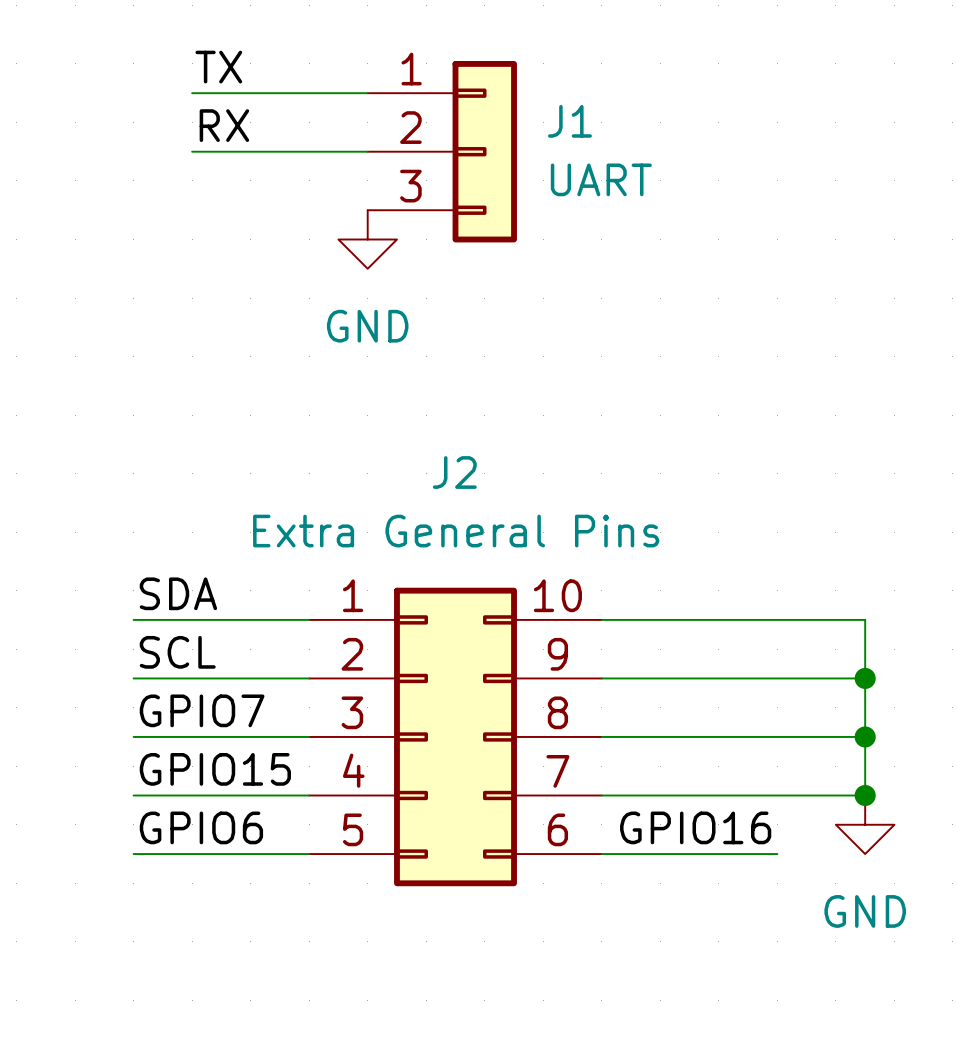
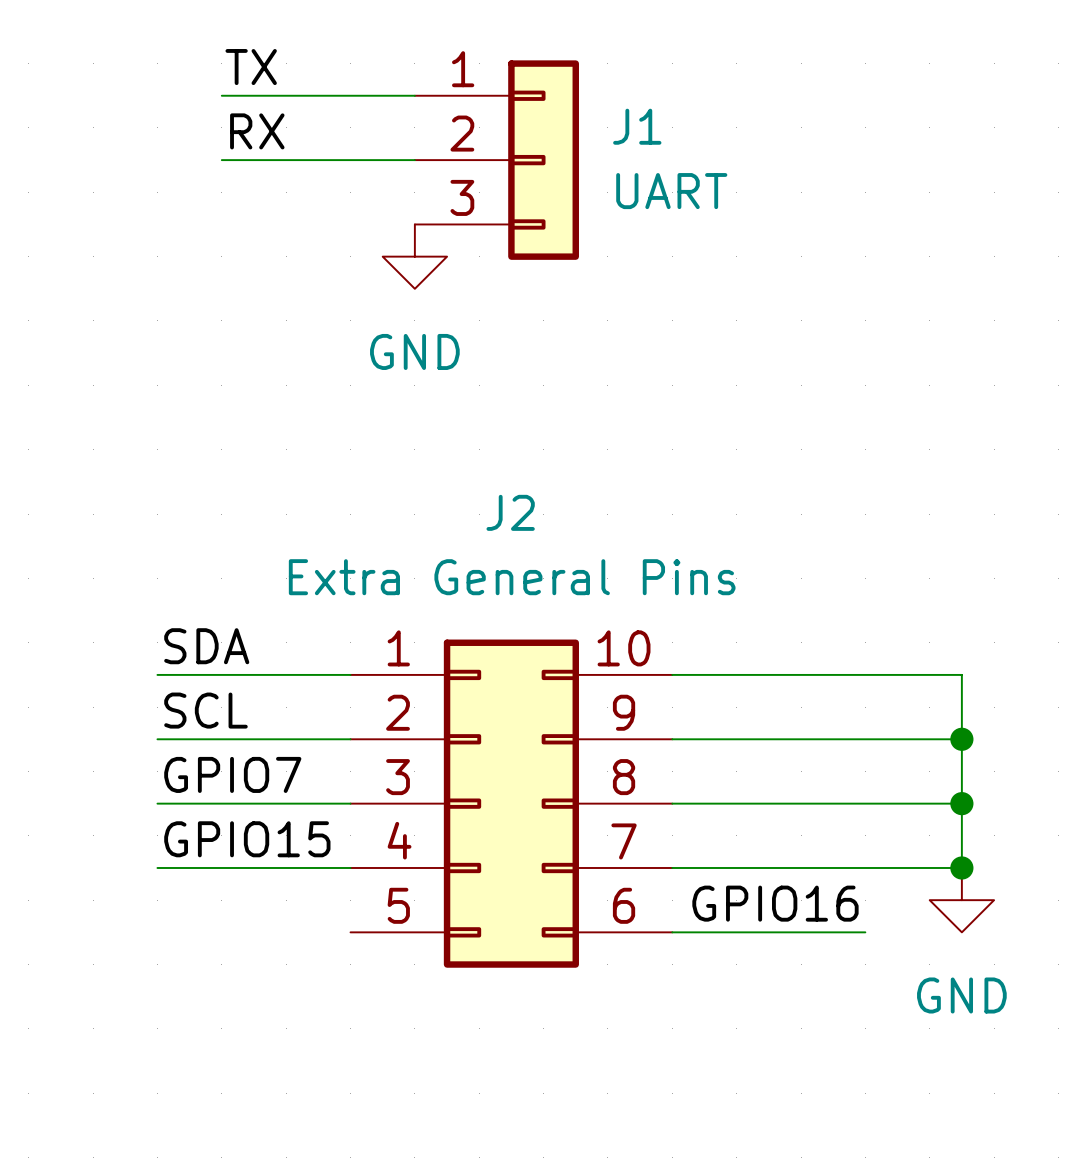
label: GPIO6 (201, 827) -> none
wire: (133, 854) (309, 854) -> none

